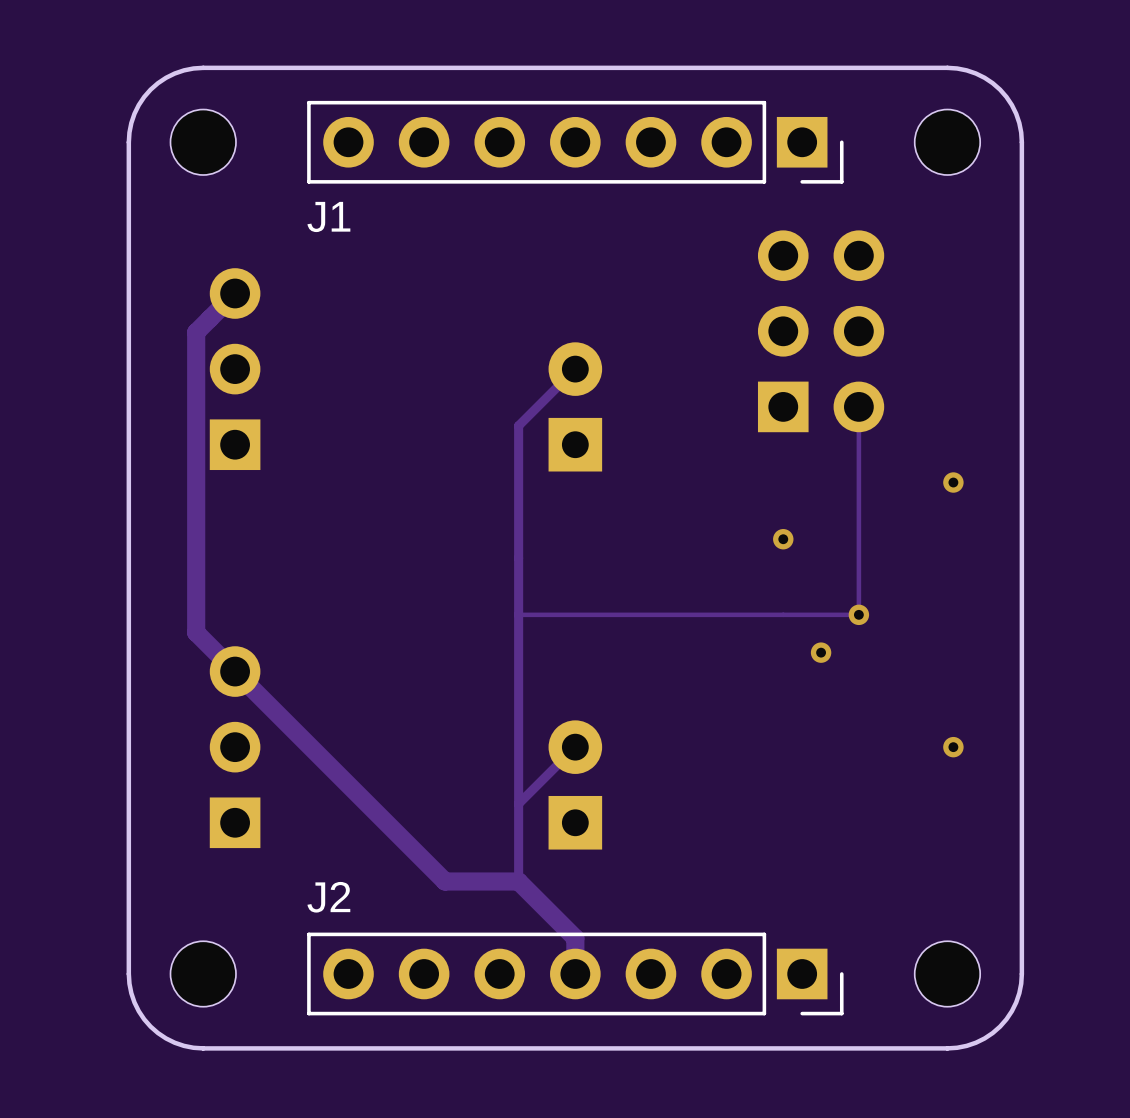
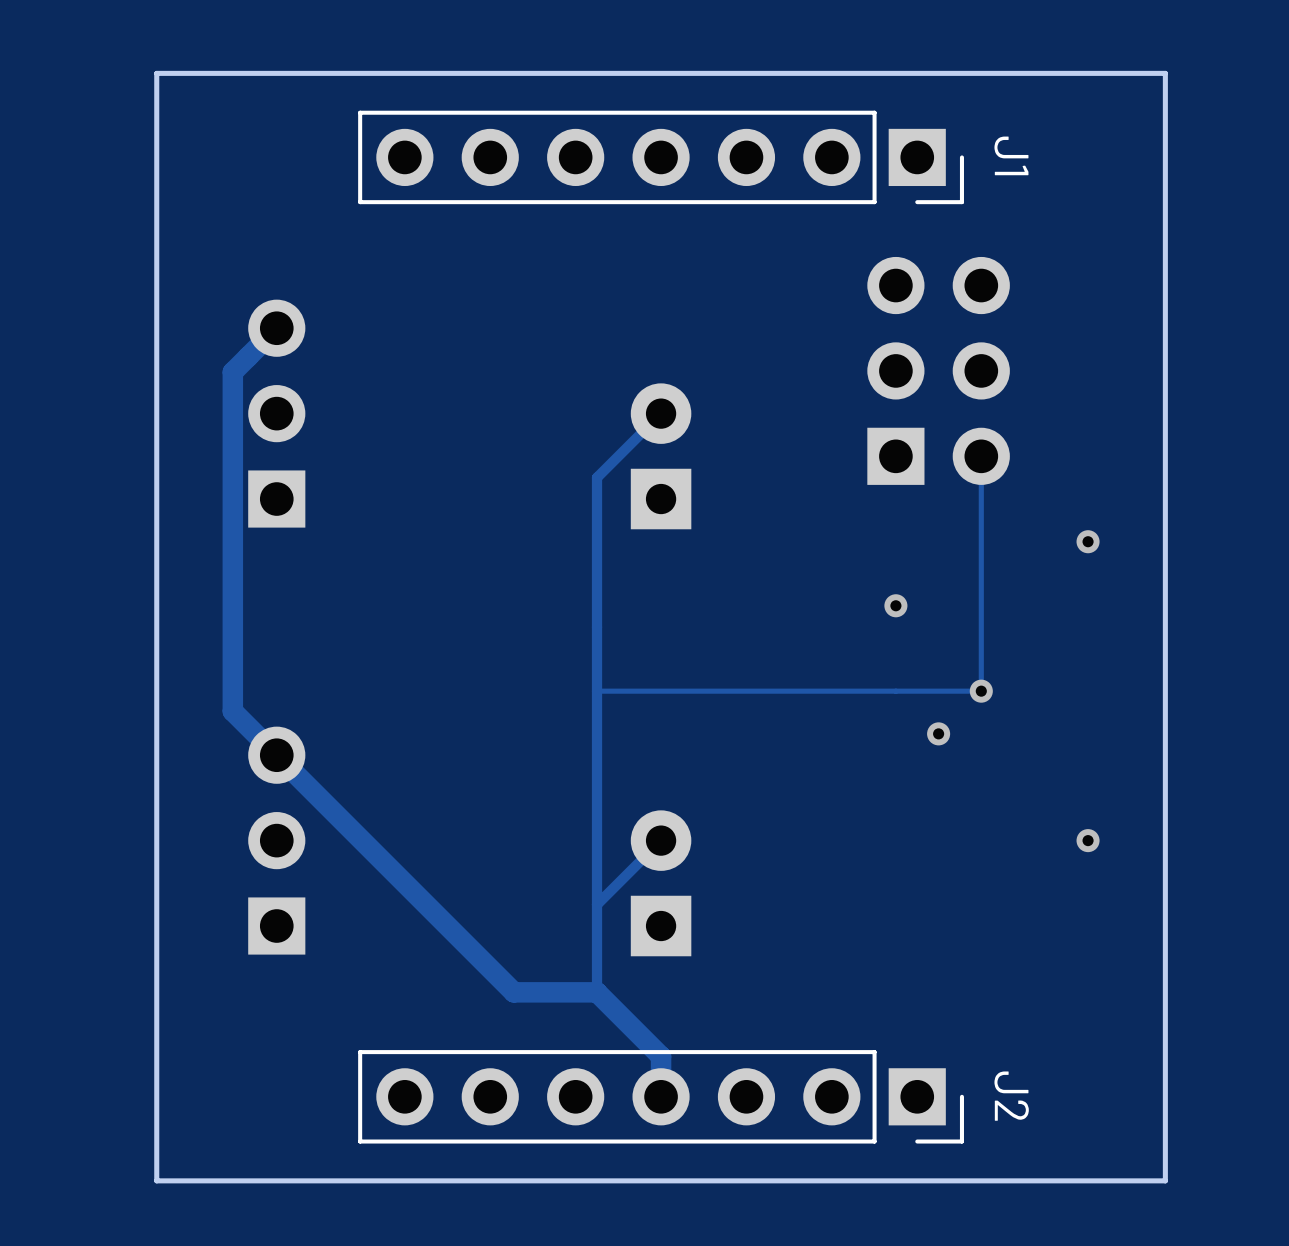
board edge: (203, 67) (174, 73) (150, 89) (134, 113) (128, 142) -> (240, 73) (156, 73) (156, 157)
board edge: (947, 67) (975, 73) (1000, 89) (1016, 113) (1021, 142) -> (1081, 73) (1165, 73) (1165, 157)
part: (203, 142) -> none
part: (947, 142) -> none
J1 name rotation: 0° (328, 216) -> 90° clockwise (1011, 155)
J1 name position: J1 (328, 216) -> J1 (1011, 155)
J2 name rotation: 0° (328, 897) -> 90° clockwise (1011, 1096)
J2 name position: J2 (328, 897) -> J2 (1011, 1096)
board edge: (128, 973) (134, 1002) (150, 1026) (174, 1042) (203, 1048) -> (156, 1096) (156, 1180) (240, 1180)
part: (203, 973) -> none
part: (947, 973) -> none
board edge: (1021, 973) (1016, 1002) (1000, 1026) (975, 1042) (947, 1048) -> (1165, 1096) (1165, 1180) (1081, 1180)

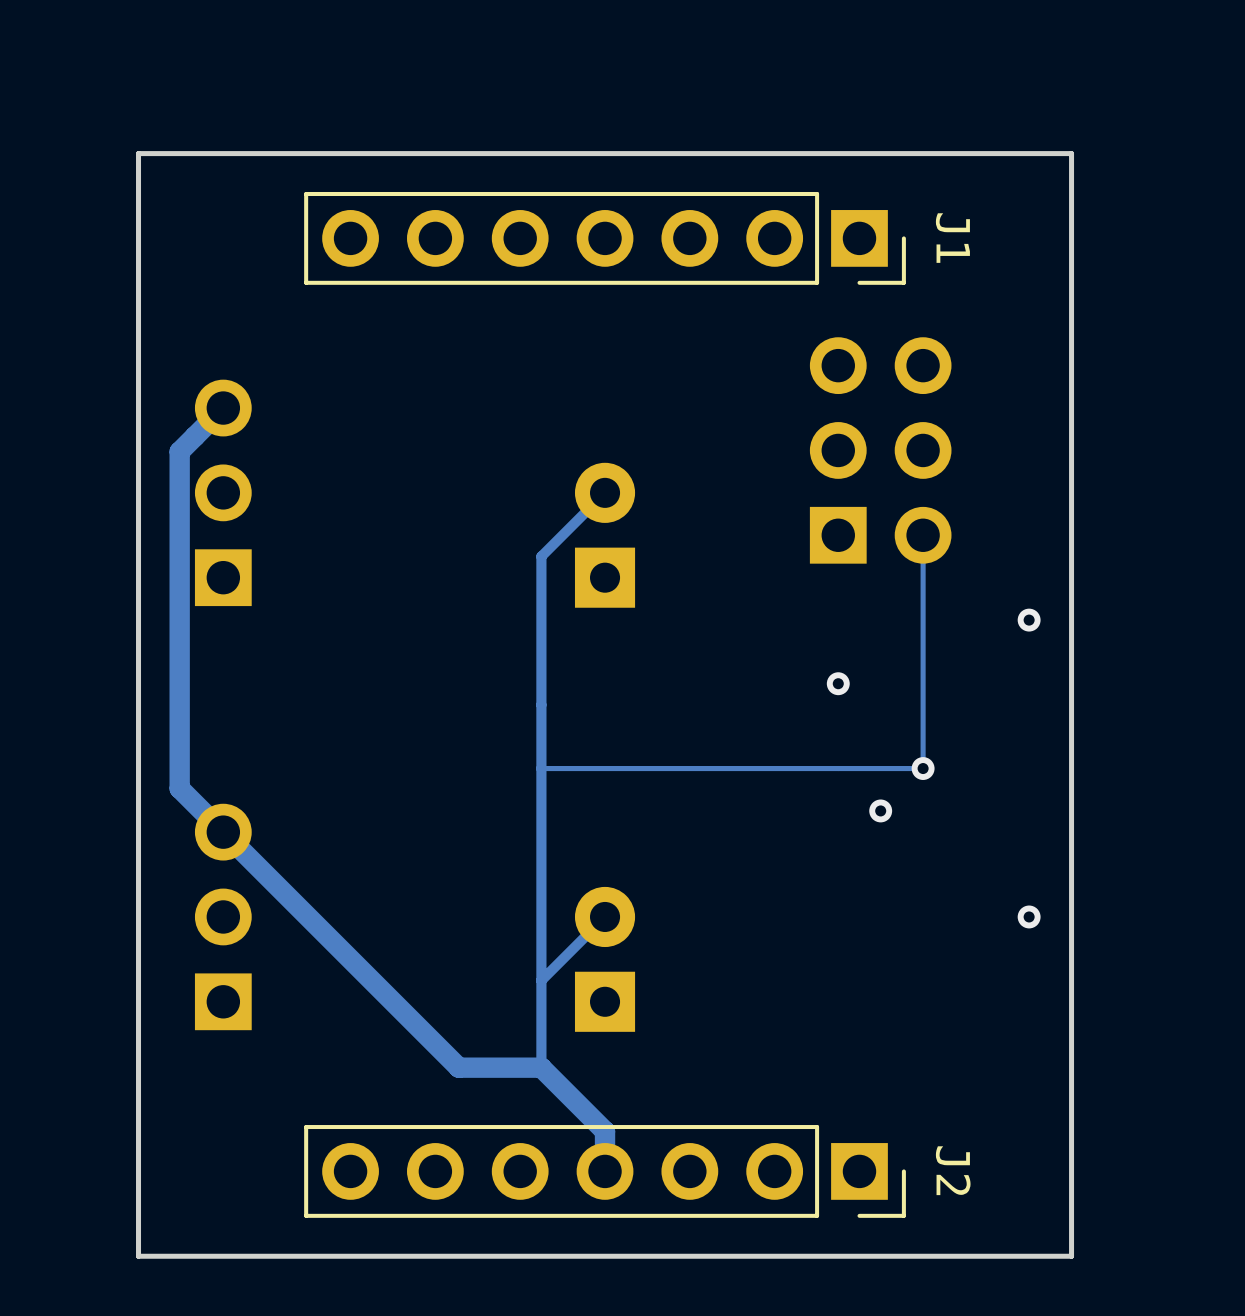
board edge: (1165, 73) (1165, 1180) (156, 1180) (156, 73) (1165, 73) -> (1071, 153) (1071, 1256) (138, 1256) (138, 153) (1071, 153)

